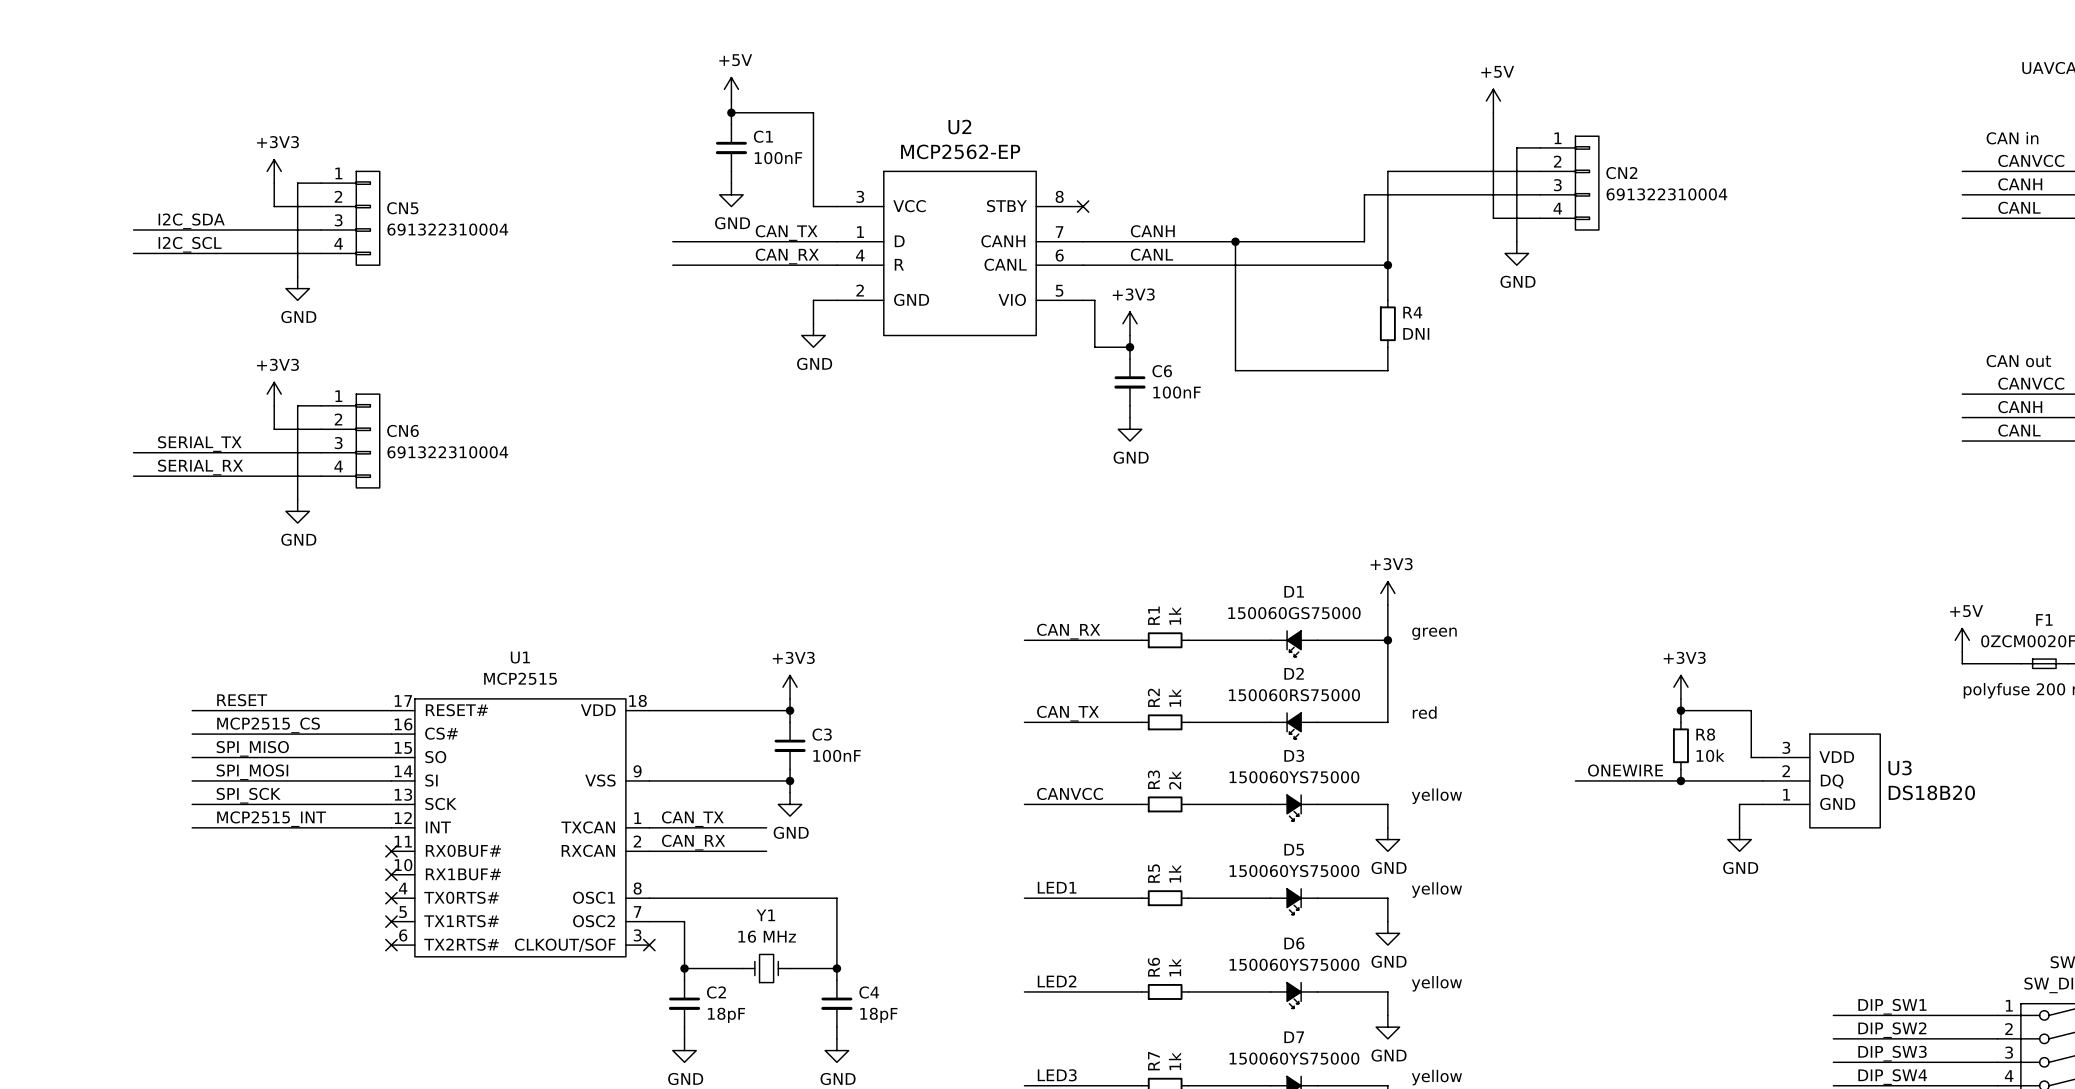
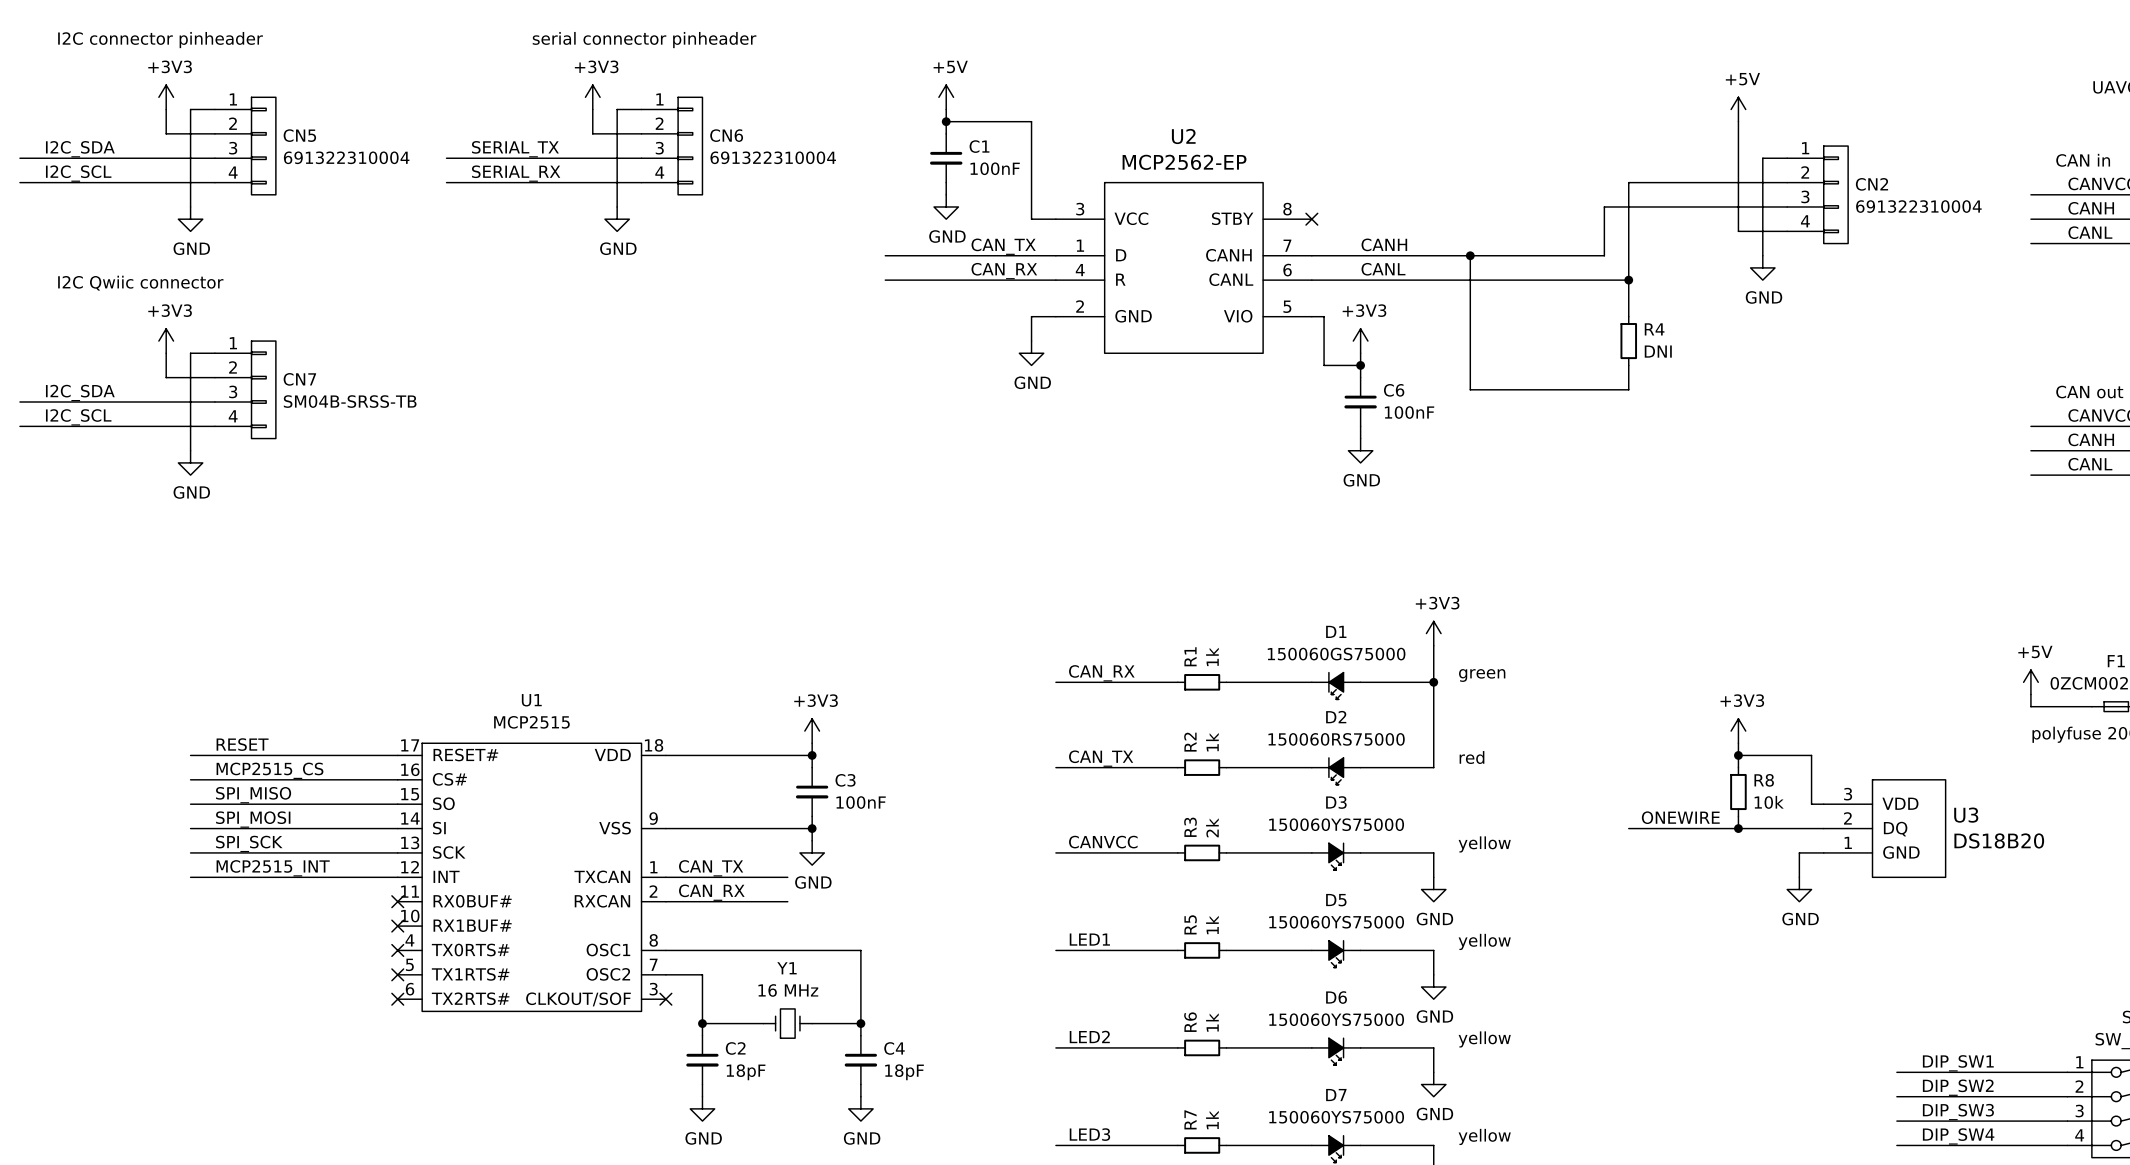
text: none -> I2C connector pinheader (160, 40)
text: none -> serial connector pinheader (644, 40)
power symbol: none -> +3V3 (166, 97)
power symbol: none -> +3V3 (592, 97)
wire: none -> (592, 109) (592, 133) (641, 133)
wire: none -> (641, 109) (617, 109) (617, 206)
power symbol position: +5V (731, 89) -> +5V (946, 97)
wire: (731, 101) (731, 124) -> (946, 109) (946, 133)
junction: none -> (946, 121)
power symbol position: +5V (1493, 101) -> +5V (1738, 109)
wire: (731, 112) (813, 112) (813, 206) (836, 206) -> (946, 121) (1031, 121) (1031, 219) (1055, 219)
junction: (731, 112) -> none
wire: (1493, 112) (1493, 218) (1540, 218) -> (1738, 121) (1738, 231) (1787, 231)
label: none -> I2C_SDA (80, 149)
label: none -> SERIAL_TX (515, 149)
wire: none -> (446, 158) (641, 158)
C1 position: (731, 147) -> (946, 158)
wire: (1540, 147) (1516, 147) (1516, 241) -> (1787, 158) (1762, 158) (1762, 255)
label: none -> I2C_SCL (78, 173)
label: none -> SERIAL_RX (516, 173)
wire: none -> (446, 182) (641, 182)
power symbol: +3V3 (274, 171) -> none
wire: (731, 171) (731, 183) -> (946, 182) (946, 194)
wire: (1540, 171) (1387, 171) (1387, 300) -> (1787, 182) (1628, 182) (1628, 316)
wire: (274, 183) (274, 206) (321, 206) -> (166, 109) (166, 133) (214, 133)
wire: (321, 183) (297, 183) (297, 276) -> (214, 109) (190, 109) (190, 206)
power symbol: none -> GND (946, 206)
CN2 position: (1569, 183) -> (1817, 194)
power symbol: none -> GND (190, 219)
power symbol: none -> GND (617, 219)
power symbol: GND (731, 194) -> none
no-connect mark: none -> (1311, 219)
wire: (1540, 194) (1364, 194) (1364, 241) (1083, 241) -> (1787, 206) (1604, 206) (1604, 255) (1311, 255)
no-connect mark: (1083, 206) -> none
CN5 position: (350, 218) -> (245, 146)
label: I2C_SDA (191, 221) -> none
wire: (133, 230) (321, 230) -> (19, 158) (214, 158)
junction: none -> (1470, 255)
label position: CANH (1152, 231) -> CANH (1384, 244)
label position: CAN_TX (786, 233) -> CAN_TX (1003, 246)
wire: (672, 241) (836, 241) -> (885, 255) (1055, 255)
wire: (1235, 241) (1235, 370) (1387, 370) (1387, 347) -> (1470, 255) (1470, 389) (1628, 389) (1628, 365)
junction: (1235, 241) -> none
power symbol: none -> GND (1762, 267)
label: I2C_SCL (190, 244) -> none
wire: (133, 253) (321, 253) -> (19, 182) (214, 182)
U2 position: (960, 253) -> (1183, 267)
power symbol: GND (1516, 253) -> none
junction: none -> (1628, 280)
label position: CANL (1152, 254) -> CANL (1383, 269)
text: none -> I2C Qwiic connector (140, 283)
label position: CAN_RX (787, 256) -> CAN_RX (1004, 271)
wire: (672, 265) (836, 265) -> (885, 280) (1055, 280)
wire: (1083, 265) (1387, 265) -> (1311, 280) (1628, 280)
junction: (1387, 265) -> none
power symbol: GND (297, 288) -> none
wire: (836, 300) (813, 300) (813, 323) -> (1055, 316) (1031, 316) (1031, 341)
wire: (1083, 300) (1094, 300) (1094, 347) (1129, 347) -> (1311, 316) (1324, 316) (1324, 365) (1360, 365)
power symbol: none -> +3V3 (166, 341)
power symbol: none -> GND (1031, 353)
power symbol position: +3V3 (1129, 323) -> +3V3 (1360, 341)
R4 position: (1387, 323) -> (1628, 341)
power symbol: GND (813, 335) -> none
wire: (1129, 335) (1129, 358) -> (1360, 353) (1360, 377)
junction: none -> (1360, 365)
junction: (1129, 347) -> none
CN7: none -> SM04B-SRSS-TB (245, 389)
label: none -> I2C_SDA (80, 392)
C6 position: (1129, 382) -> (1360, 402)
label: none -> I2C_SCL (78, 417)
power symbol: +3V3 (274, 394) -> none
wire: (274, 405) (274, 429) (321, 429) -> (166, 353) (166, 377) (214, 377)
wire: (321, 405) (297, 405) (297, 499) -> (214, 353) (190, 353) (190, 450)
wire: (1129, 405) (1129, 417) -> (1360, 426) (1360, 438)
power symbol: none -> GND (1360, 450)
power symbol: none -> GND (190, 462)
power symbol: GND (1129, 429) -> none
CN6 position: (350, 441) -> (672, 146)
label: SERIAL_TX (199, 444) -> none
wire: (133, 452) (321, 452) -> (19, 402) (214, 402)
label: SERIAL_RX (200, 467) -> none
wire: (133, 476) (321, 476) -> (19, 426) (214, 426)
power symbol: GND (297, 511) -> none

